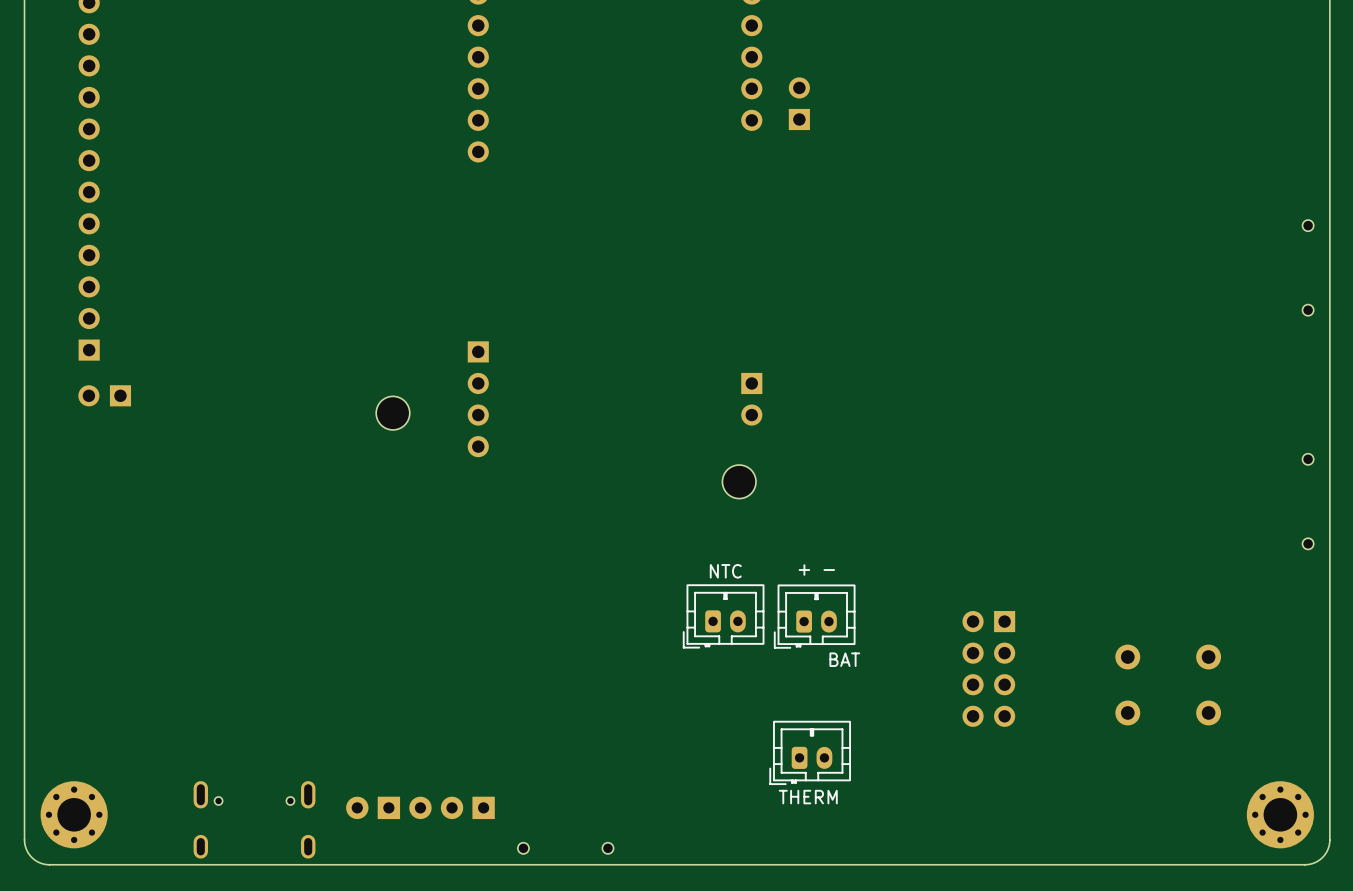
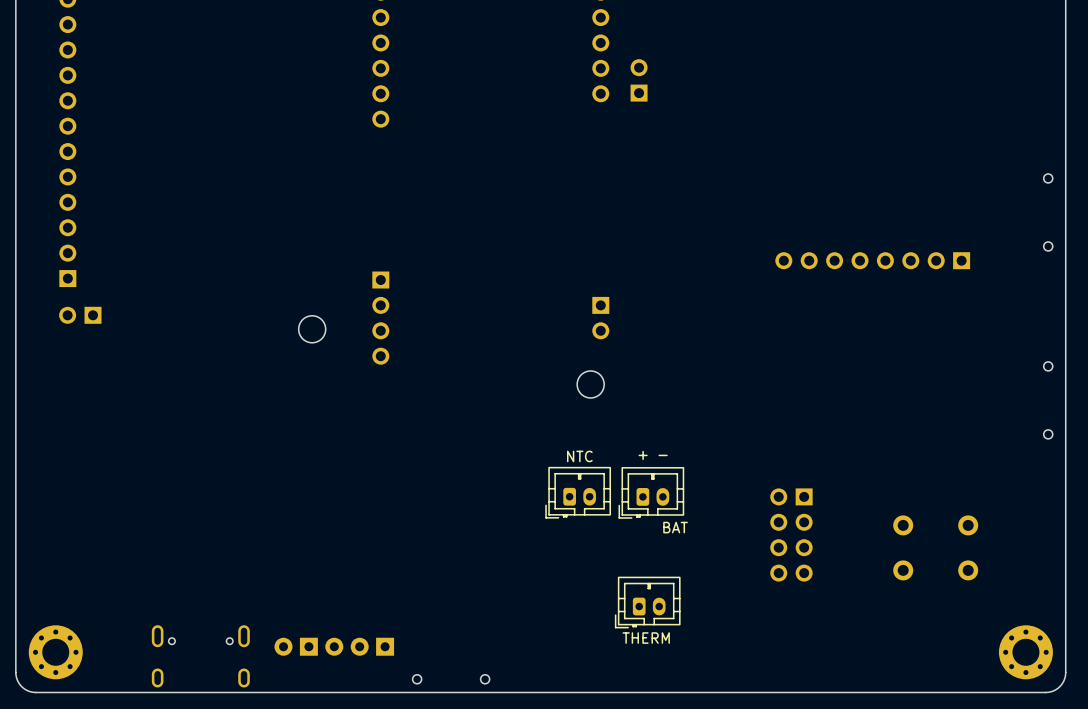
part: none -> (872, 260)

